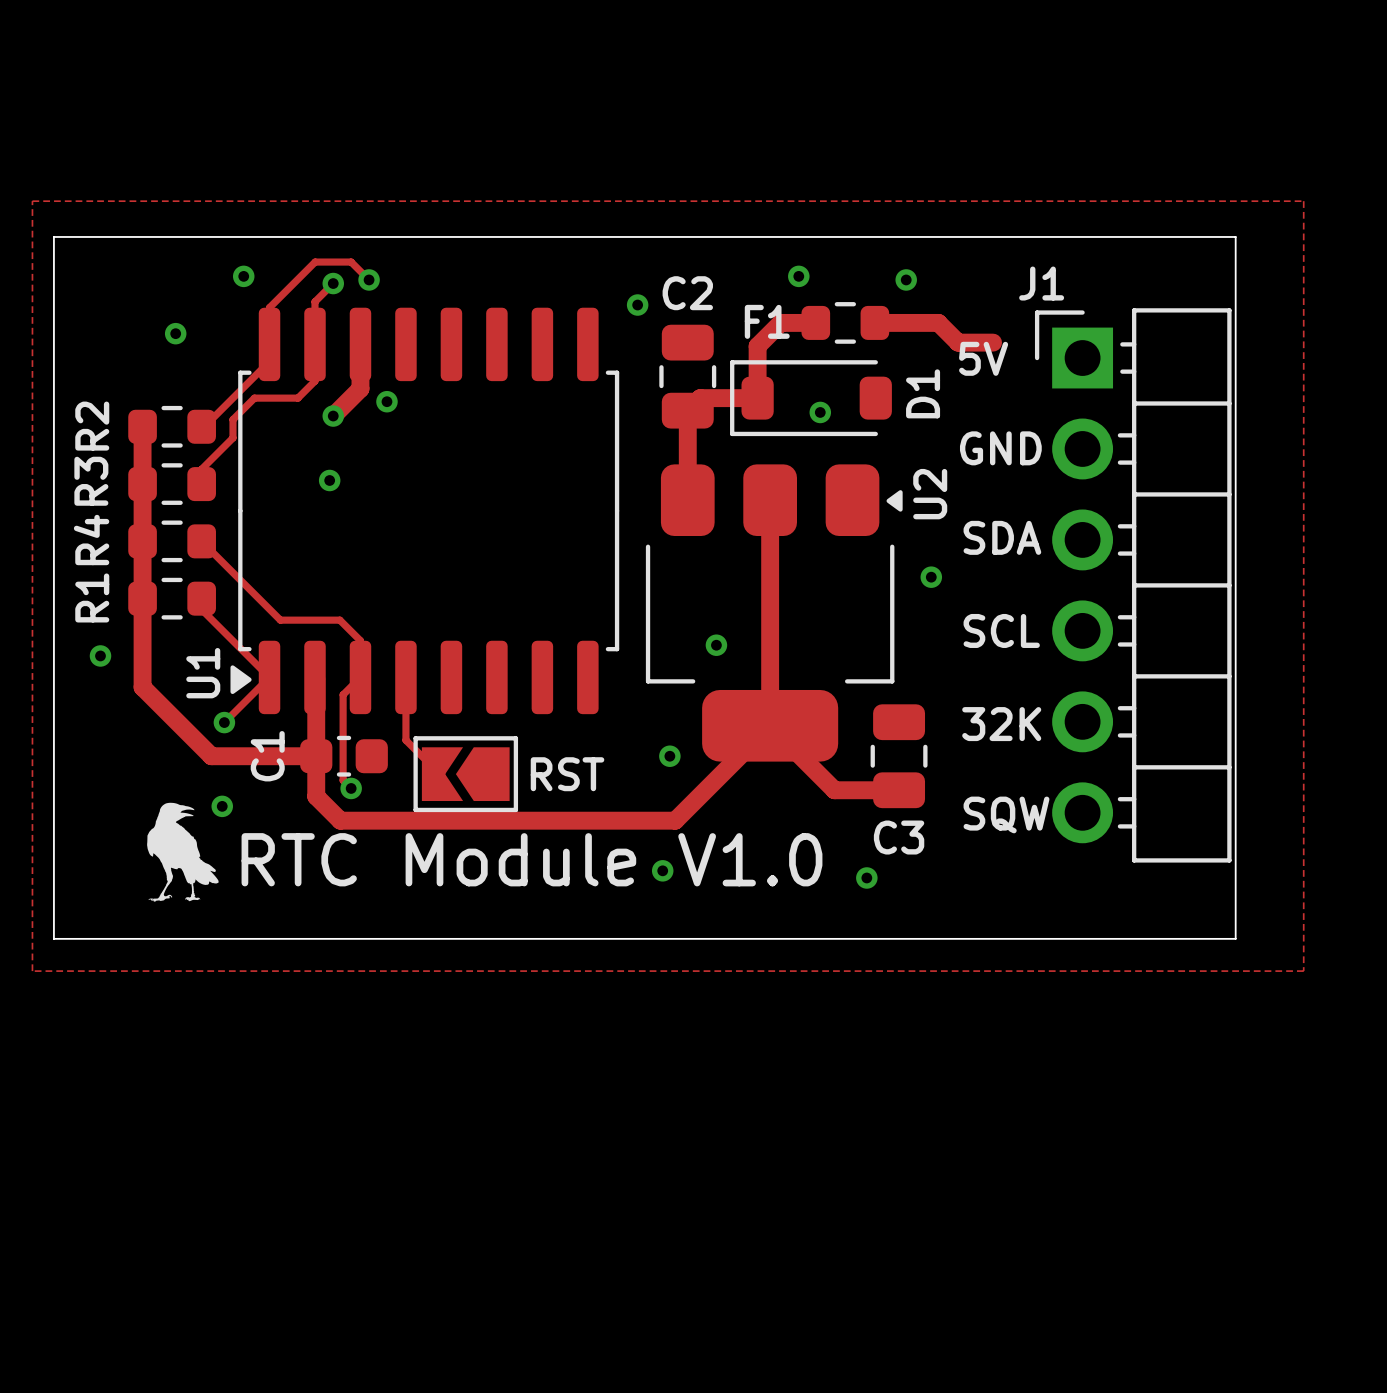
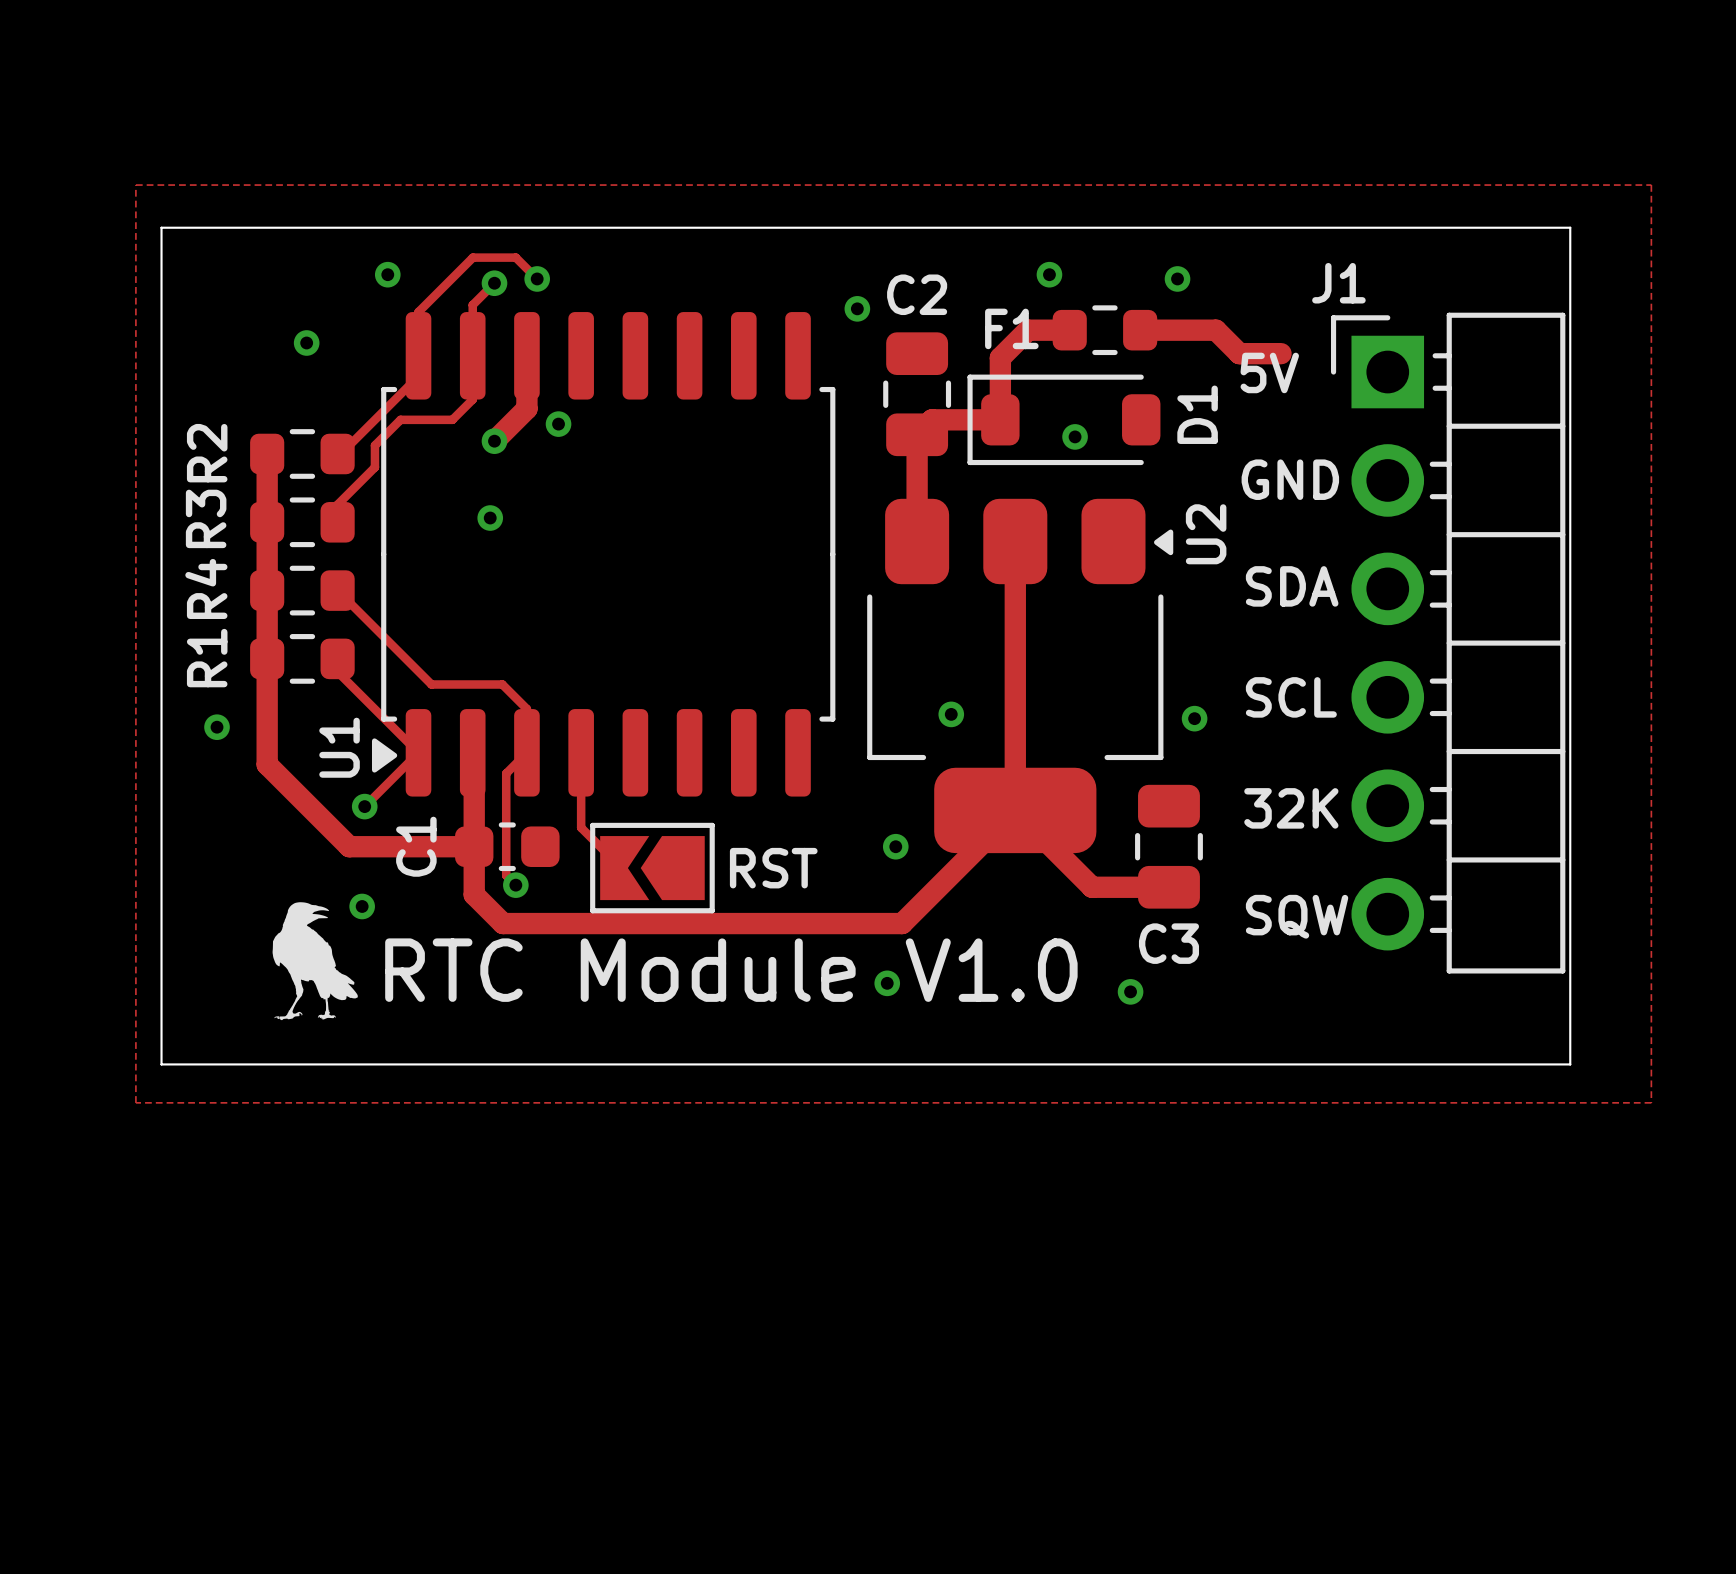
via position: (931, 577) -> (1194, 718)

